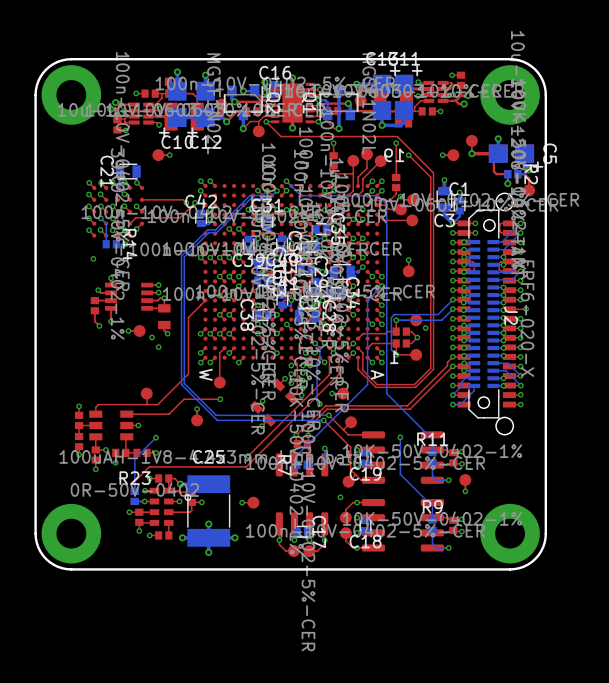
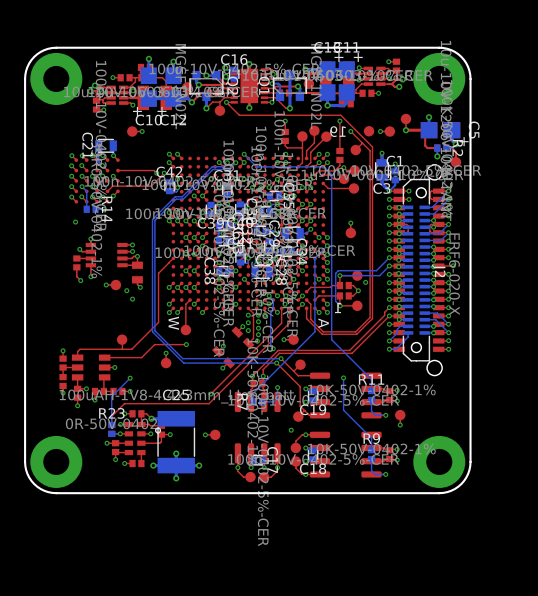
part: none -> (369, 131)
top track: none -> (362, 143) (355, 149)
part: none -> (355, 149)

